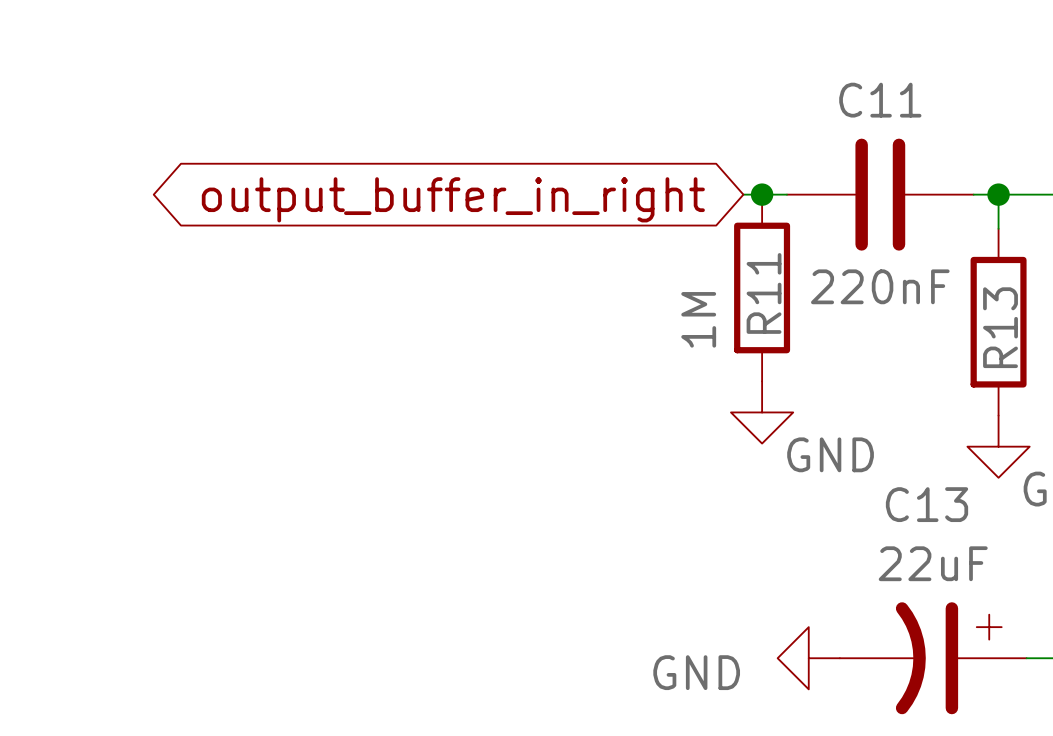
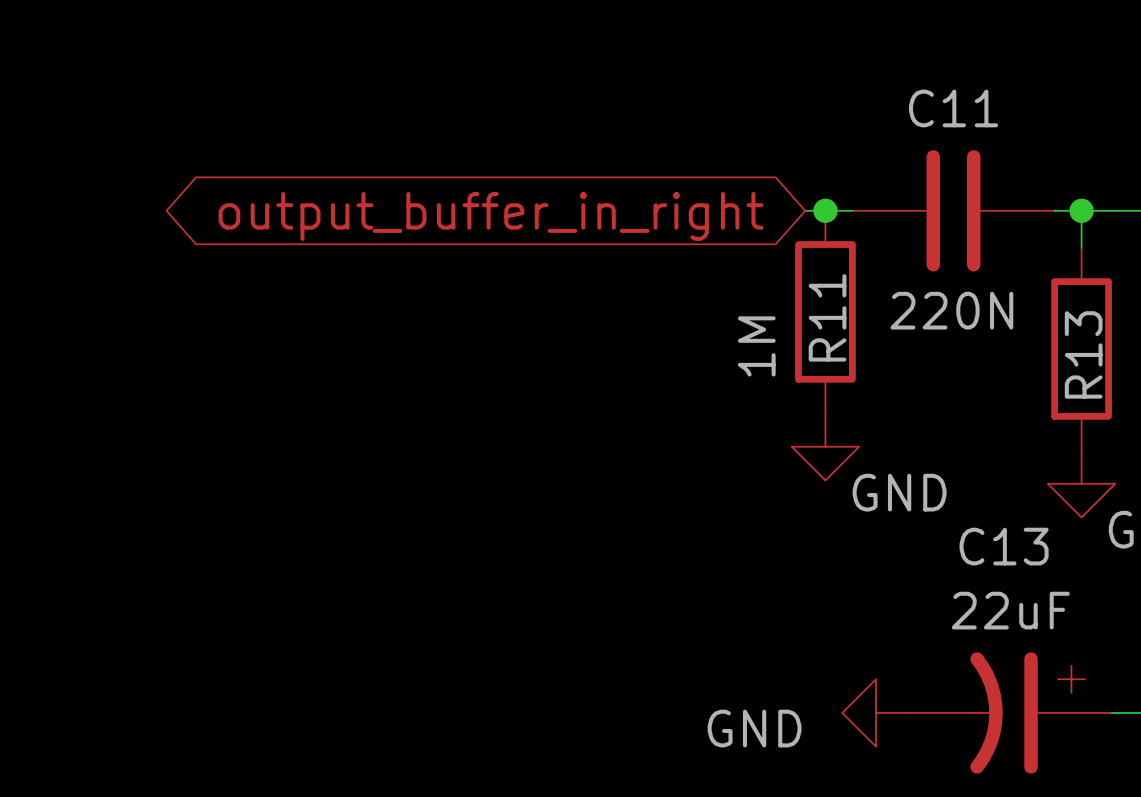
C11 value: 220nF (880, 286) -> 220N (951, 310)

